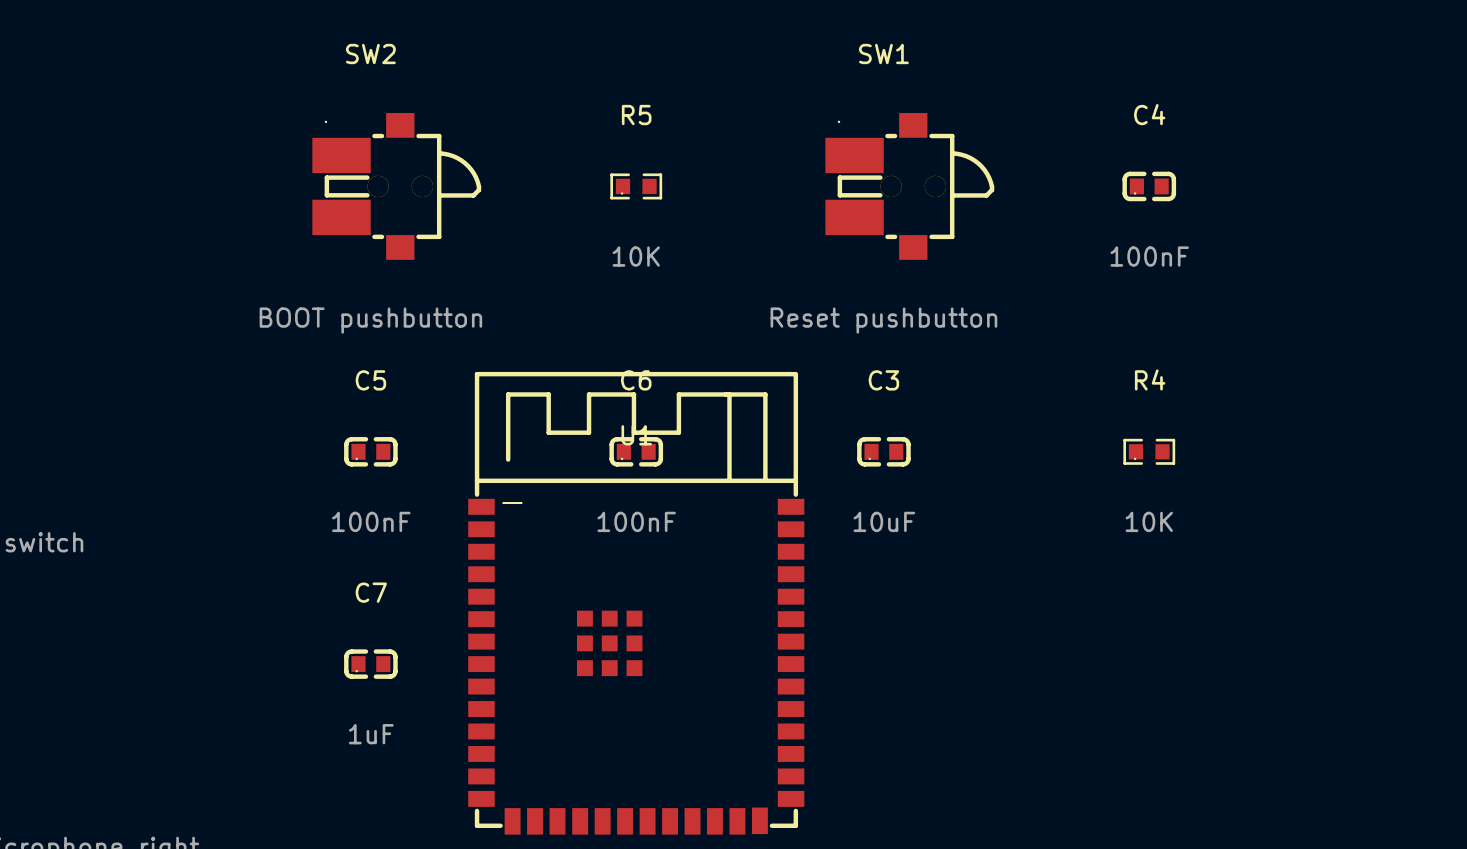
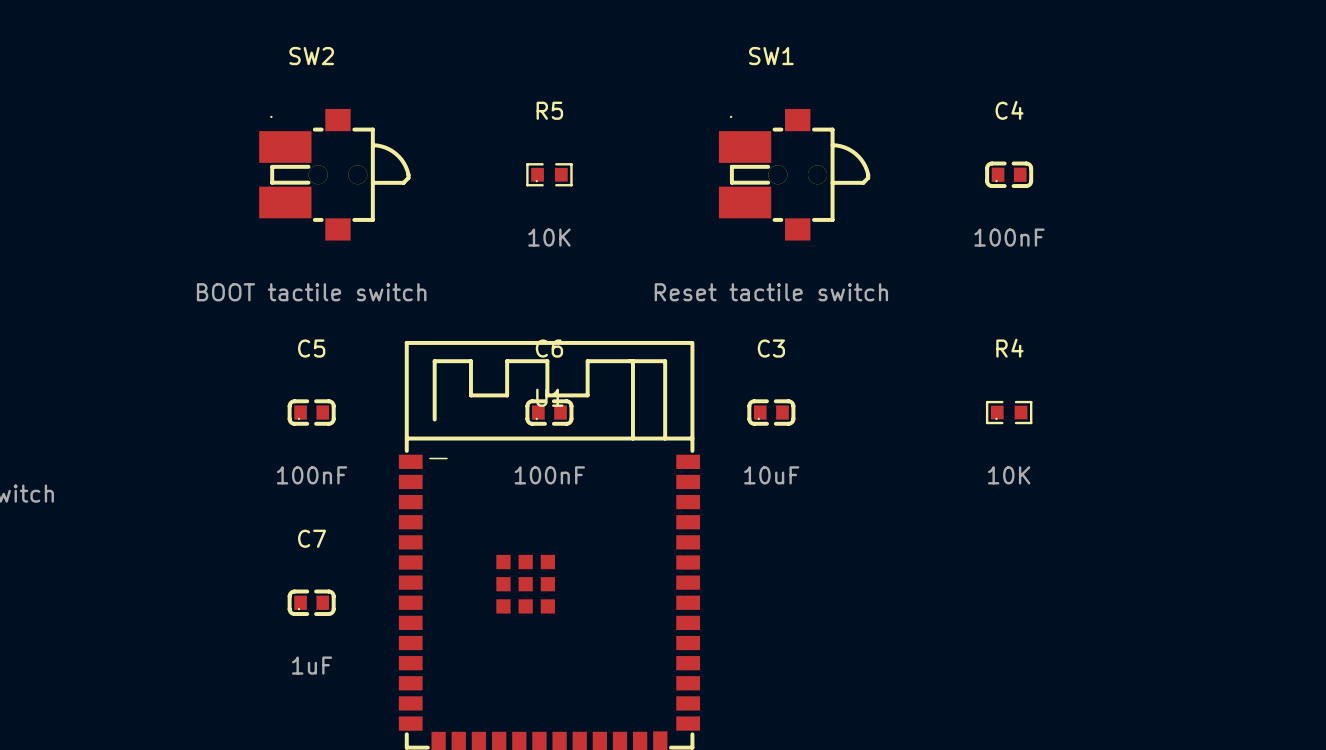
SW2 value: BOOT pushbutton (370, 320) -> BOOT tactile switch (311, 292)
SW1 value: Reset pushbutton (883, 320) -> Reset tactile switch (771, 292)

